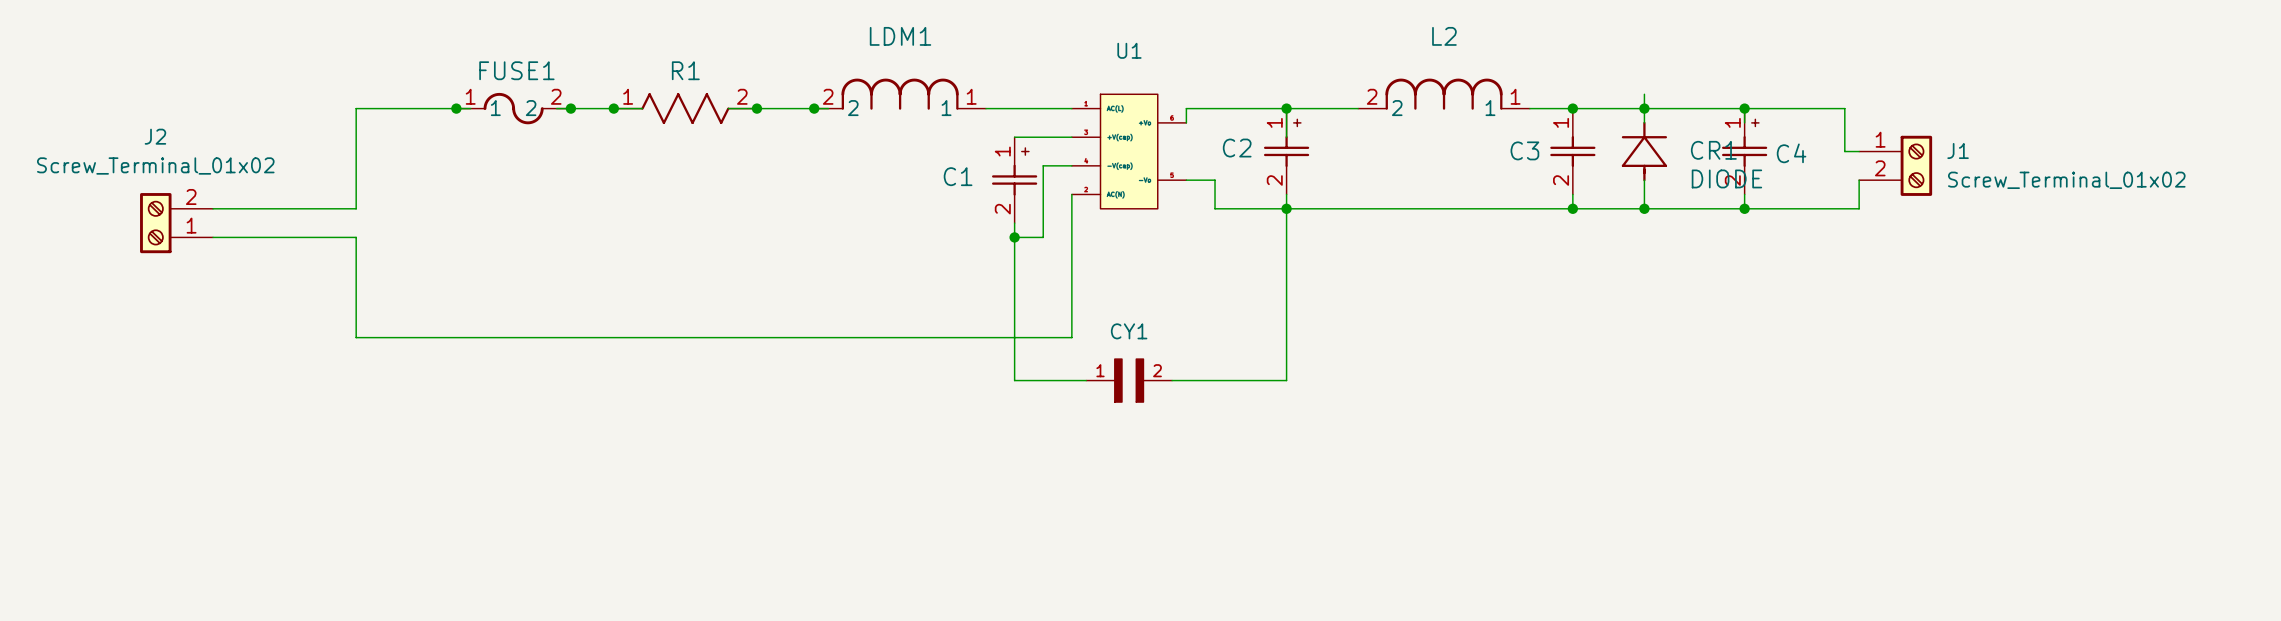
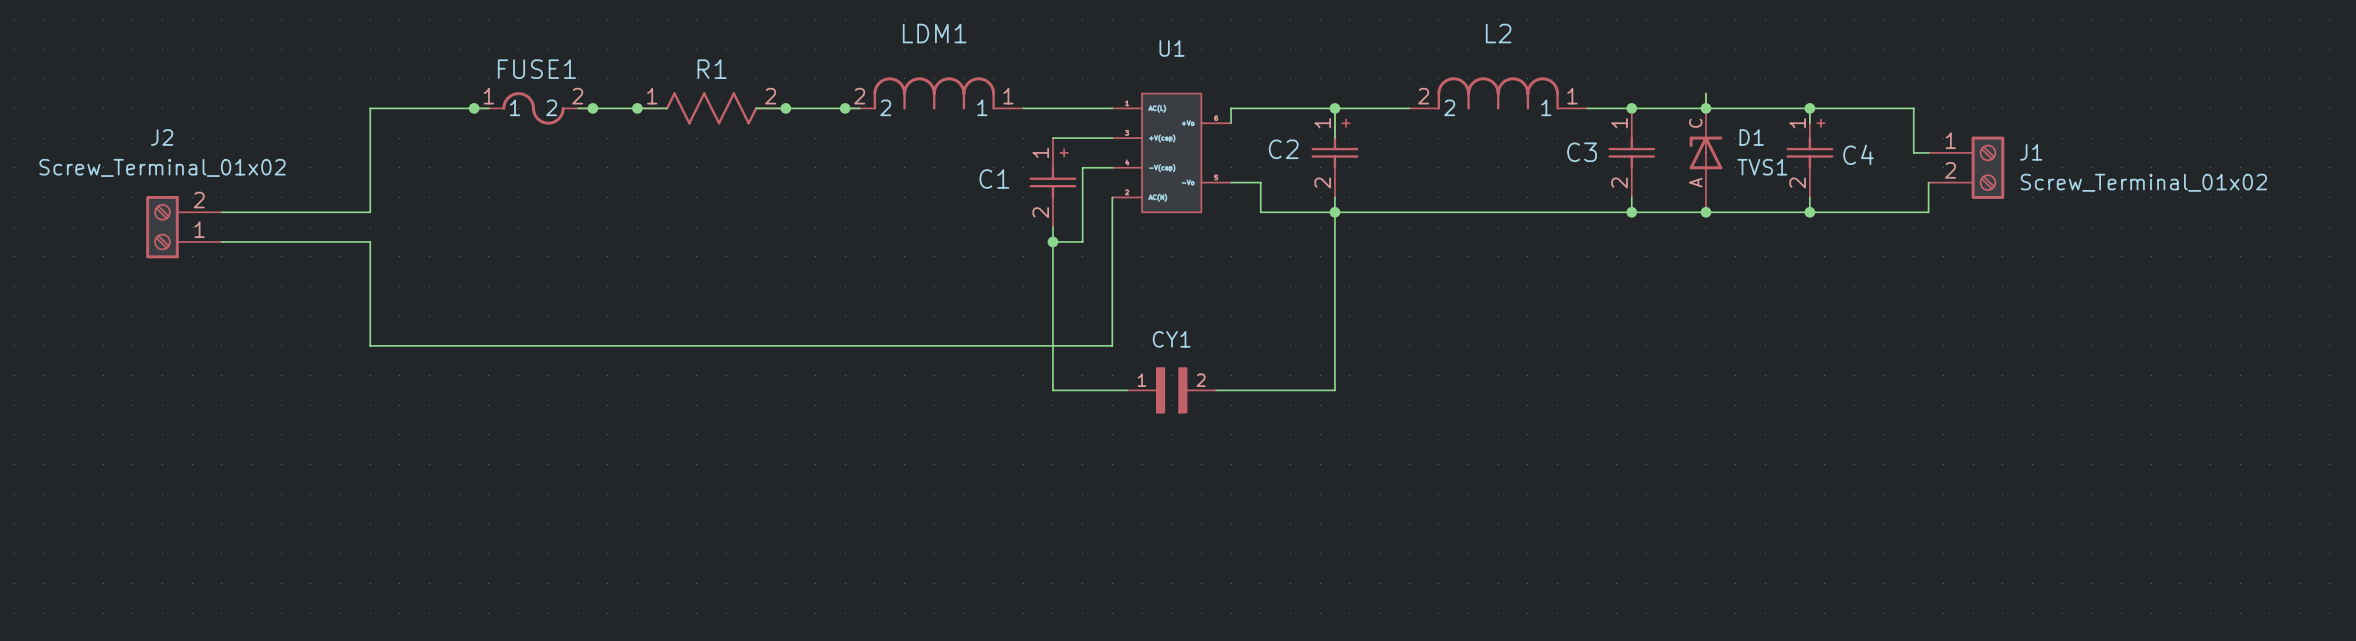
CR1: DIODE (1644, 151) -> none
D1: none -> TVS1 (1705, 152)

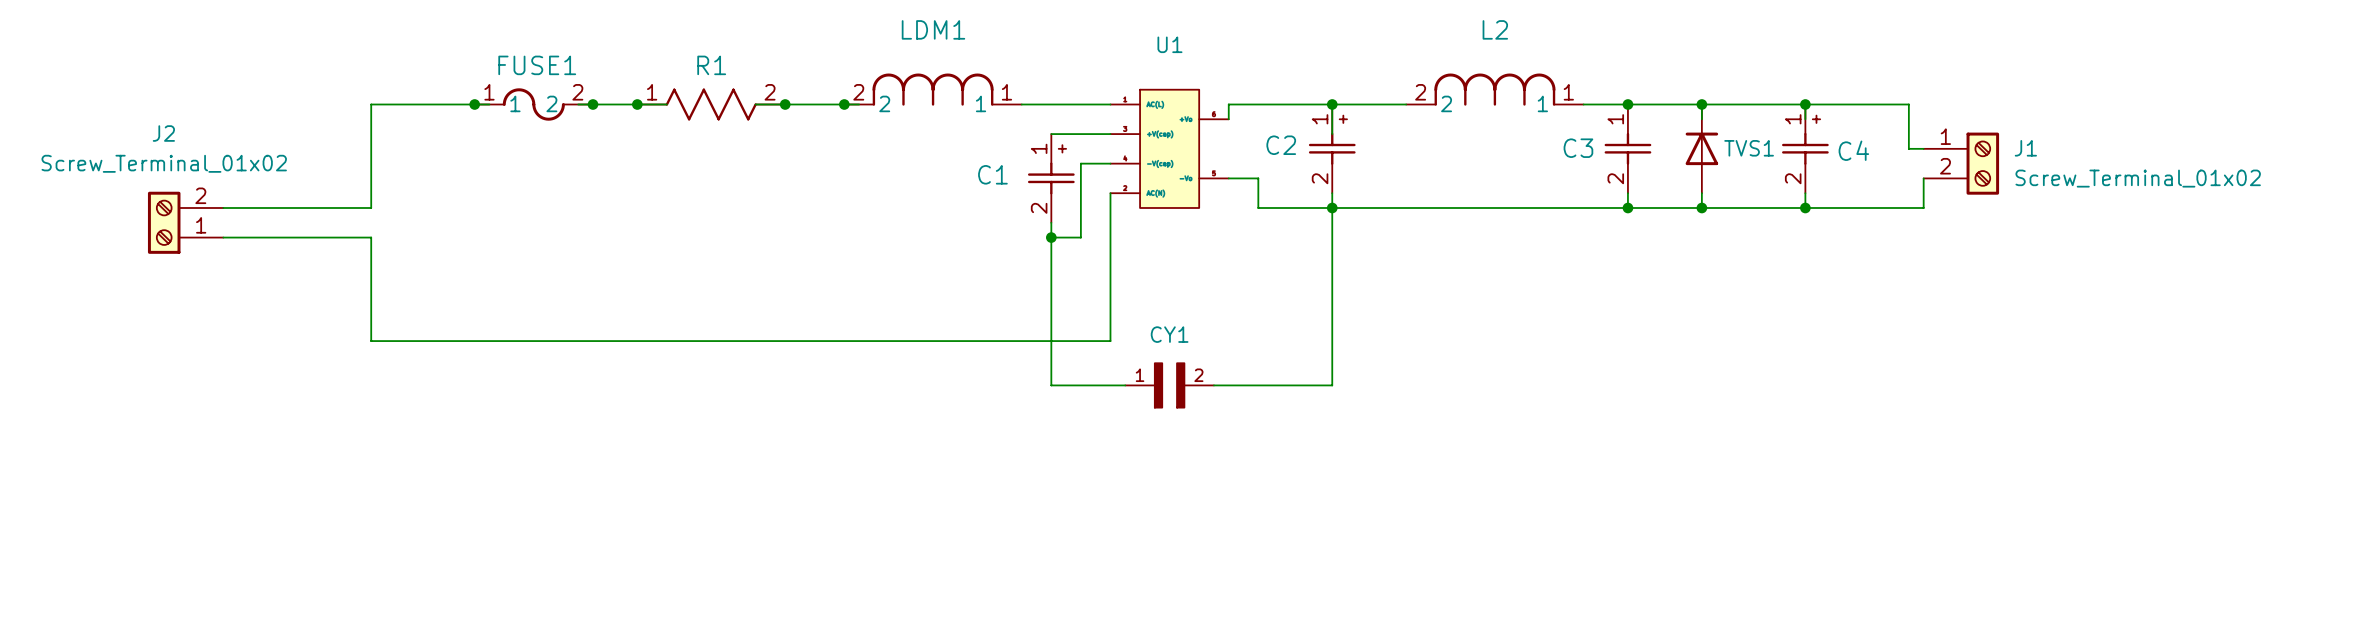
D1: TVS1 (1705, 152) -> none
TVS1: none -> (1701, 148)

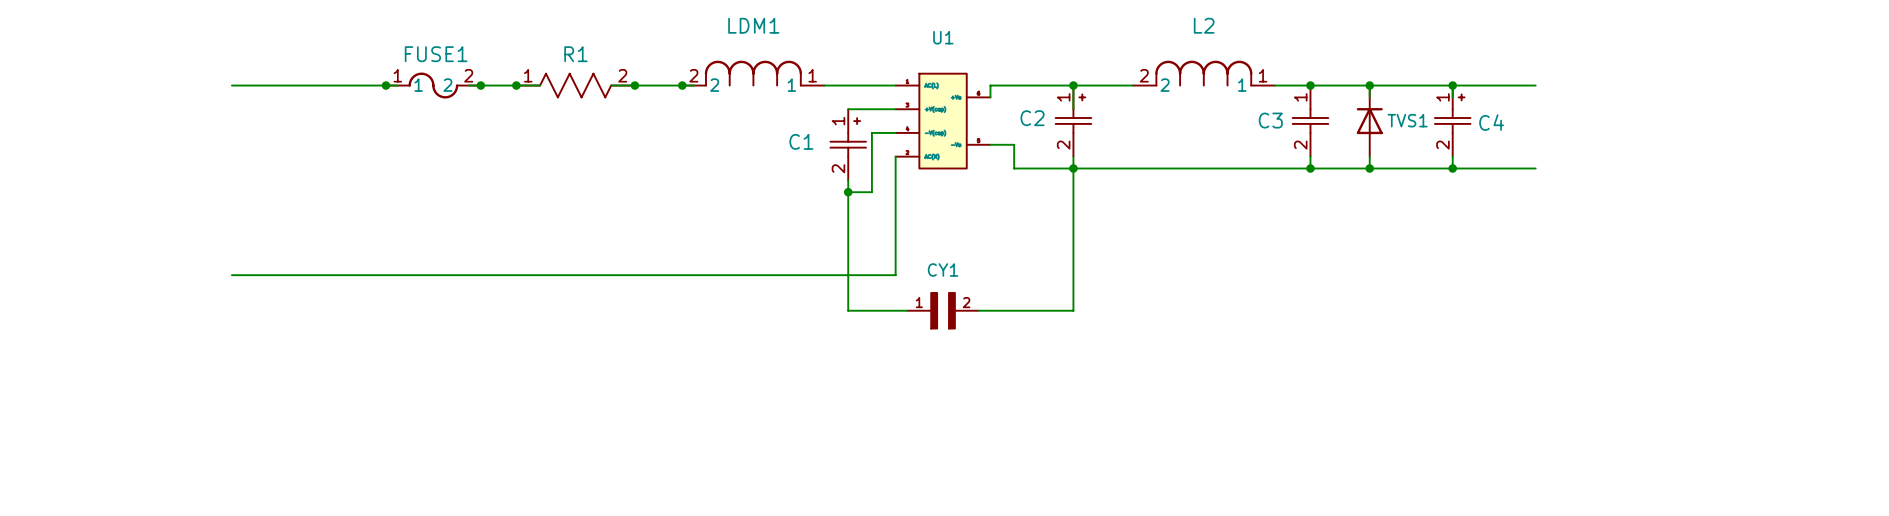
wire: (371, 104) (371, 207) (223, 207) -> (303, 85) (231, 85)
wire: (1908, 104) (1908, 148) (1923, 148) -> none
J1: Screw_Terminal_01x02 (1961, 163) -> none
wire: (1923, 178) (1923, 207) (1908, 207) -> none
J2: Screw_Terminal_01x02 (185, 222) -> none
wire: (223, 237) (371, 237) (371, 341) -> (231, 275) (303, 275)

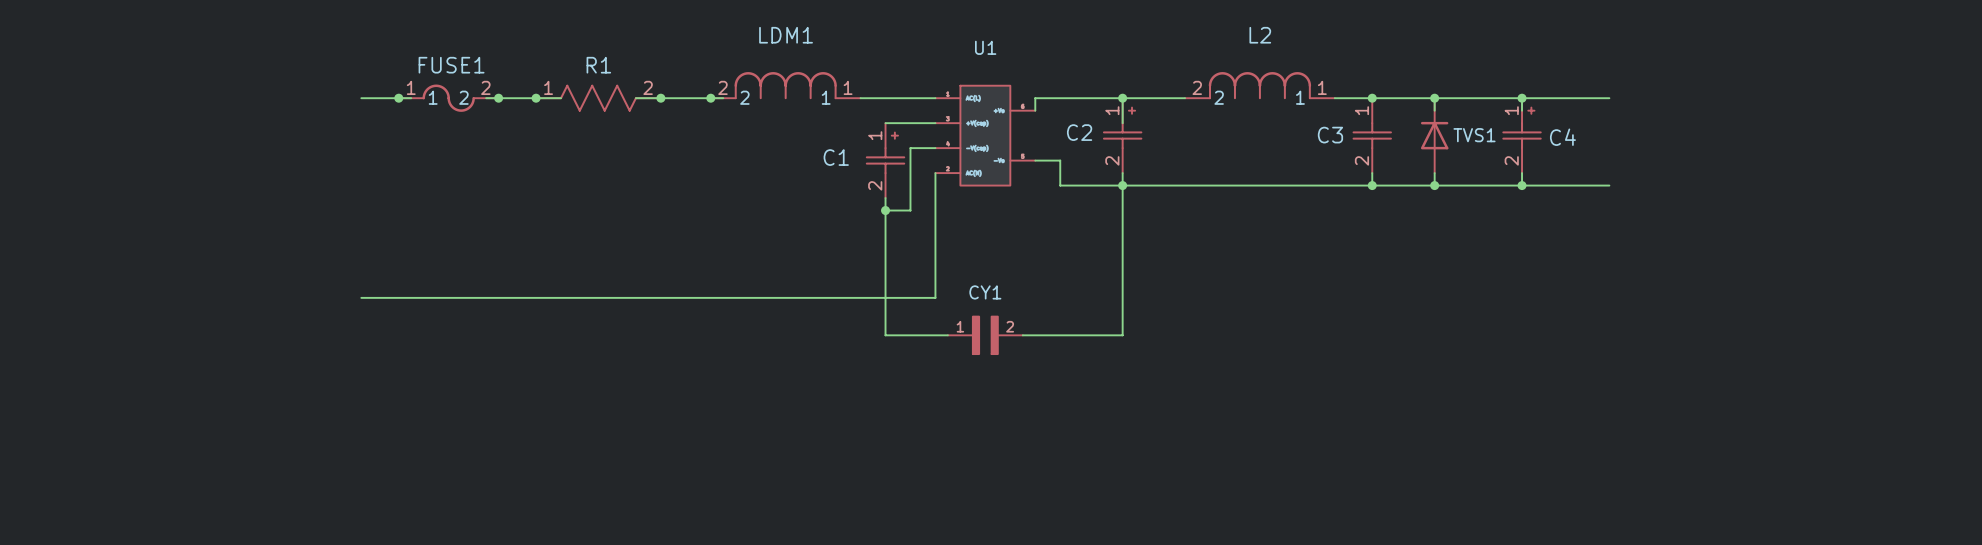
wire: (231, 85) (350, 85) -> none
wire: (231, 275) (350, 275) -> none

